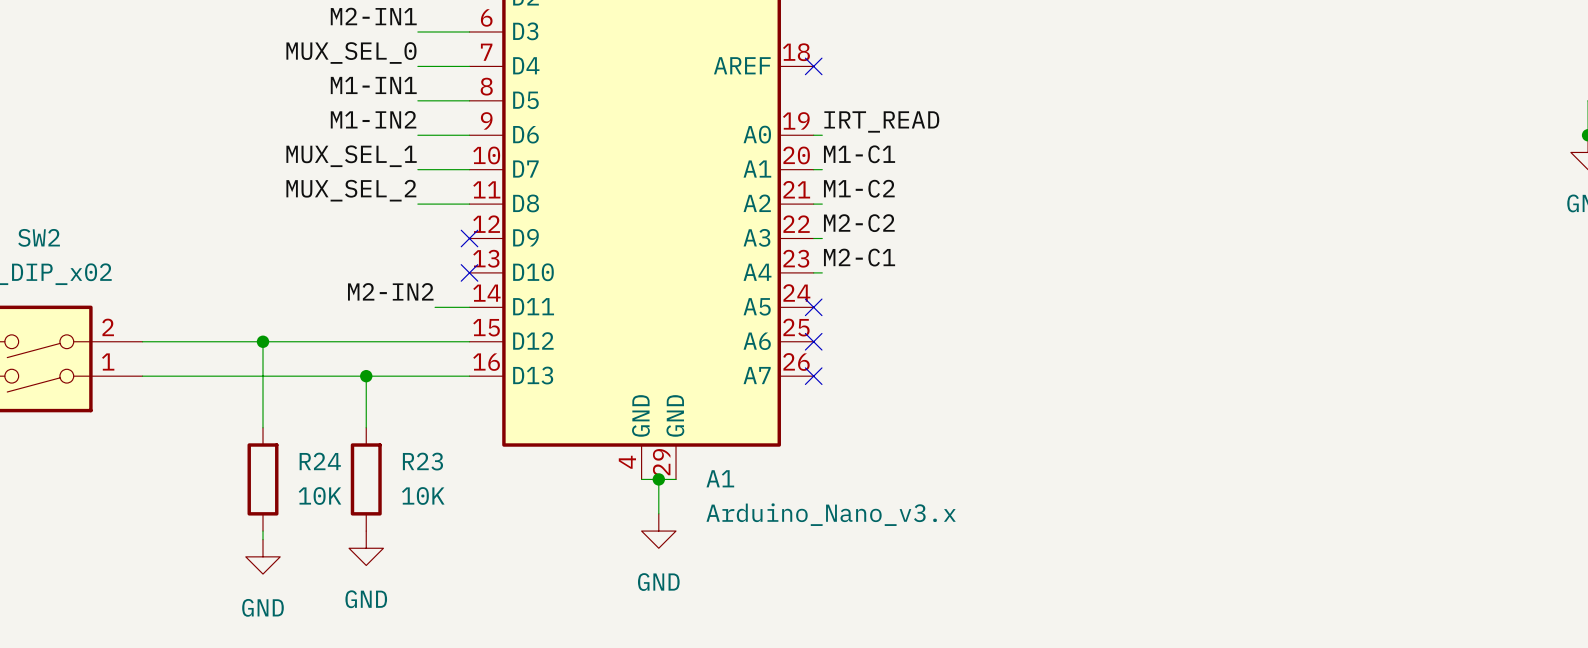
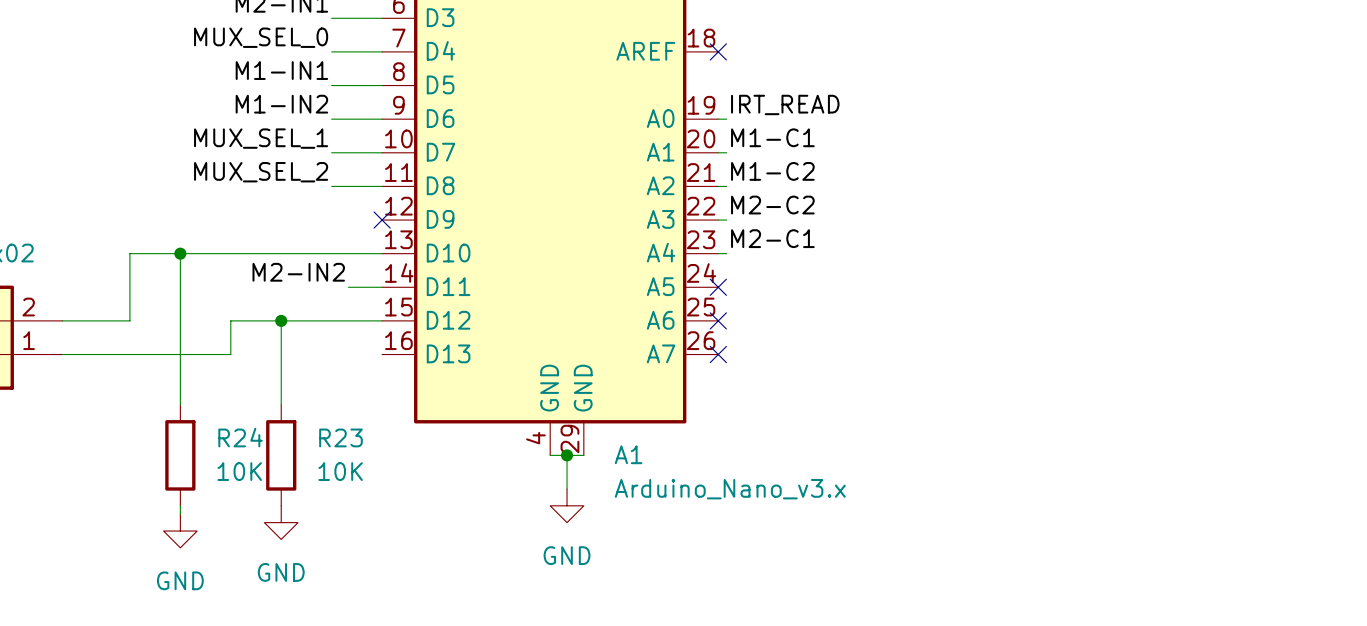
wire: none -> (180, 253) (180, 320)
junction: none -> (180, 253)
wire: none -> (382, 253) (129, 253) (129, 320)
no-connect mark: (469, 272) -> none
wire: (211, 341) (314, 341) -> (230, 354) (230, 320)
junction: (263, 341) -> none
wire: none -> (281, 320) (281, 354)
wire: (314, 376) (469, 376) -> none
junction position: (366, 376) -> (281, 320)

